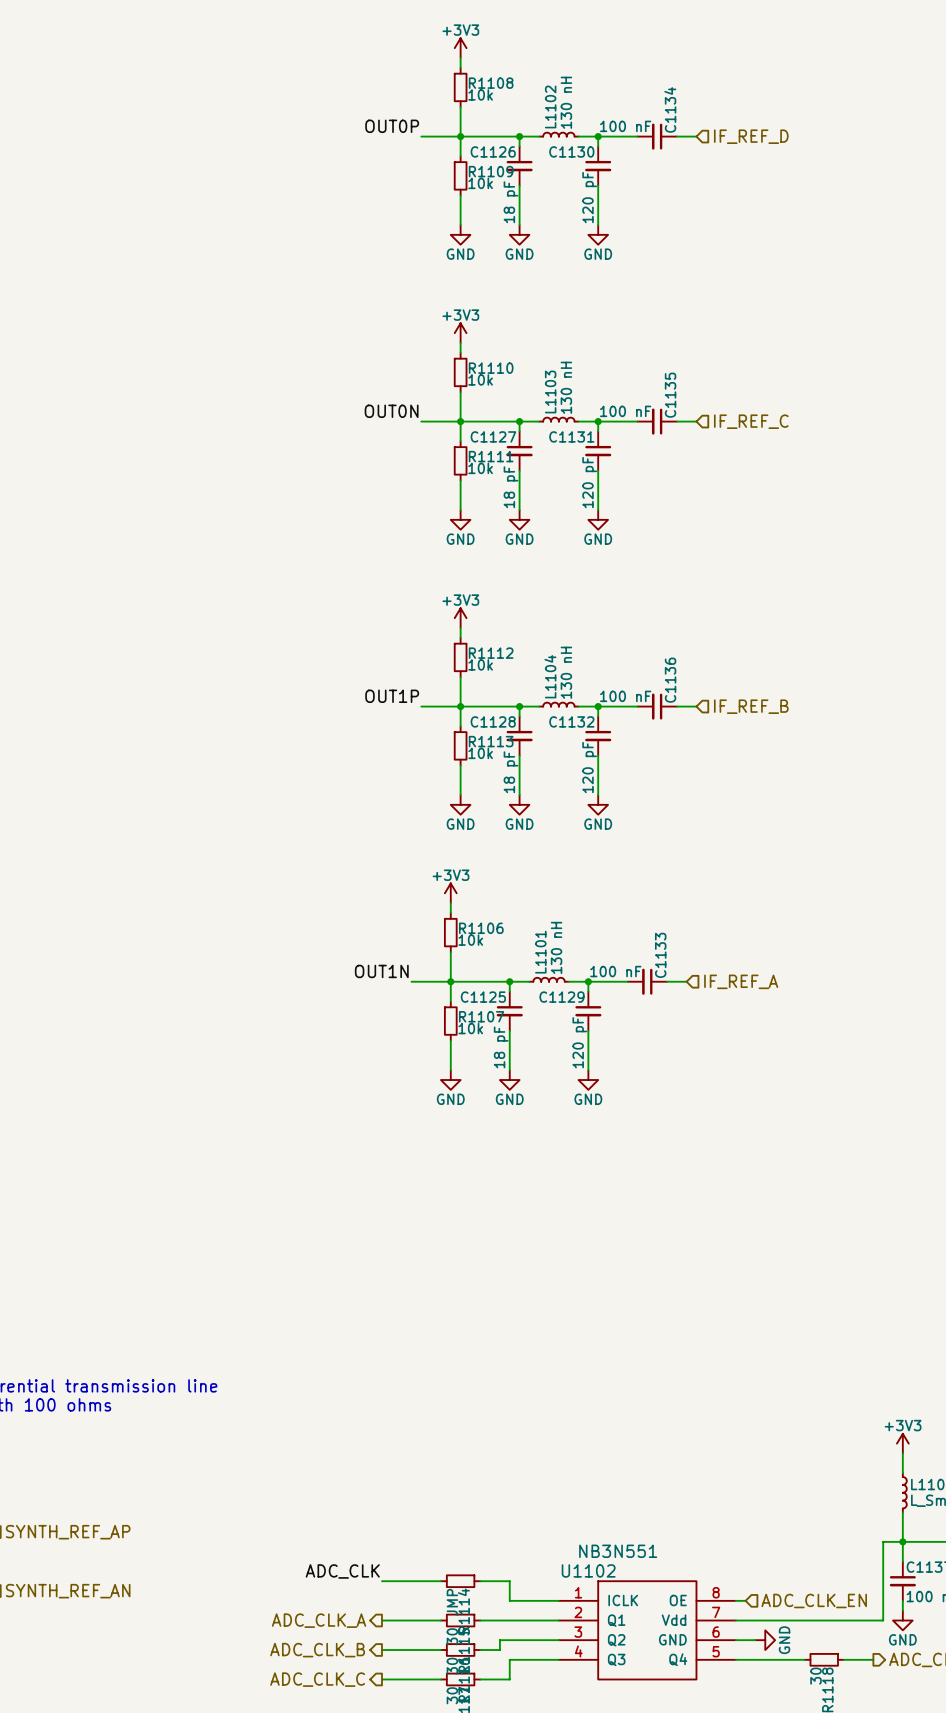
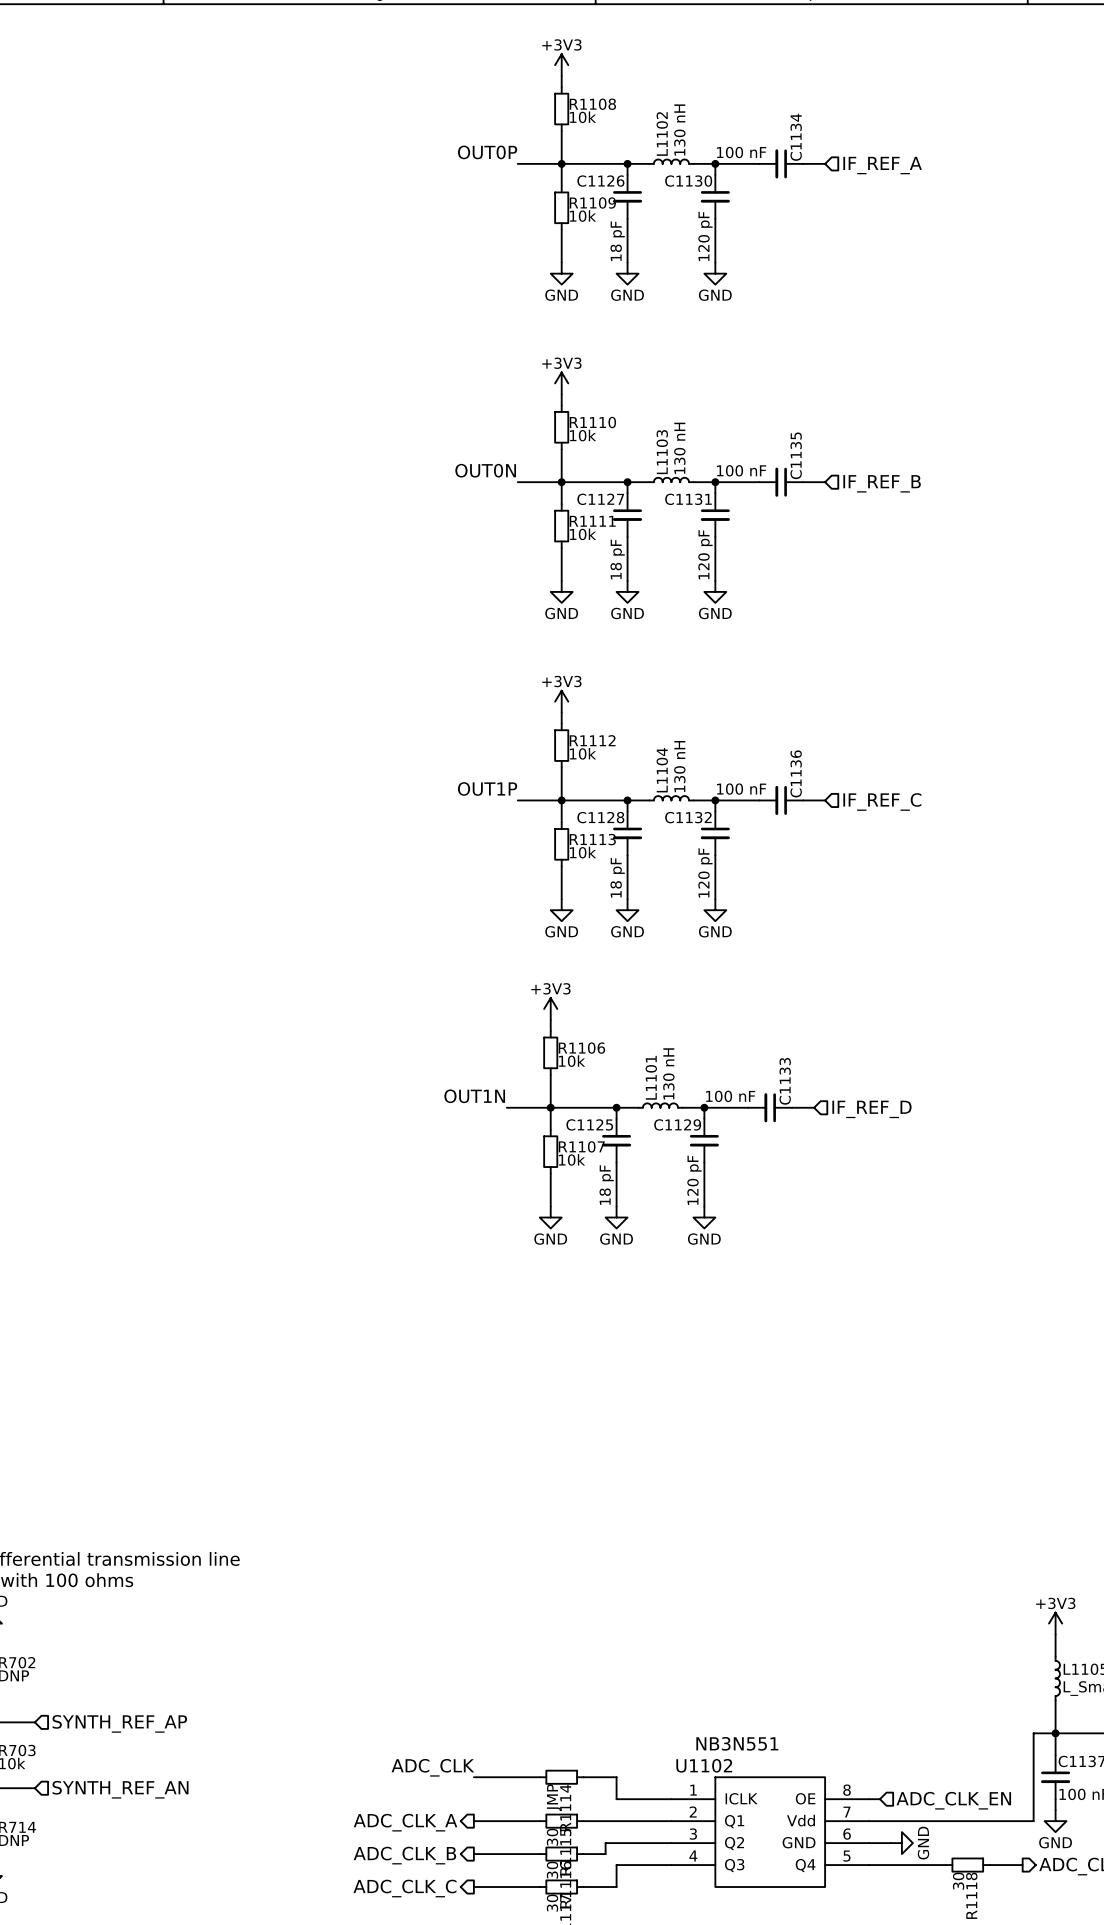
hierarchical label: IF_REF_D (751, 136) -> IF_REF_A (882, 165)
hierarchical label: IF_REF_C (751, 421) -> IF_REF_B (882, 483)
hierarchical label: IF_REF_B (751, 706) -> IF_REF_C (882, 801)
hierarchical label: IF_REF_A (741, 981) -> IF_REF_D (871, 1109)

